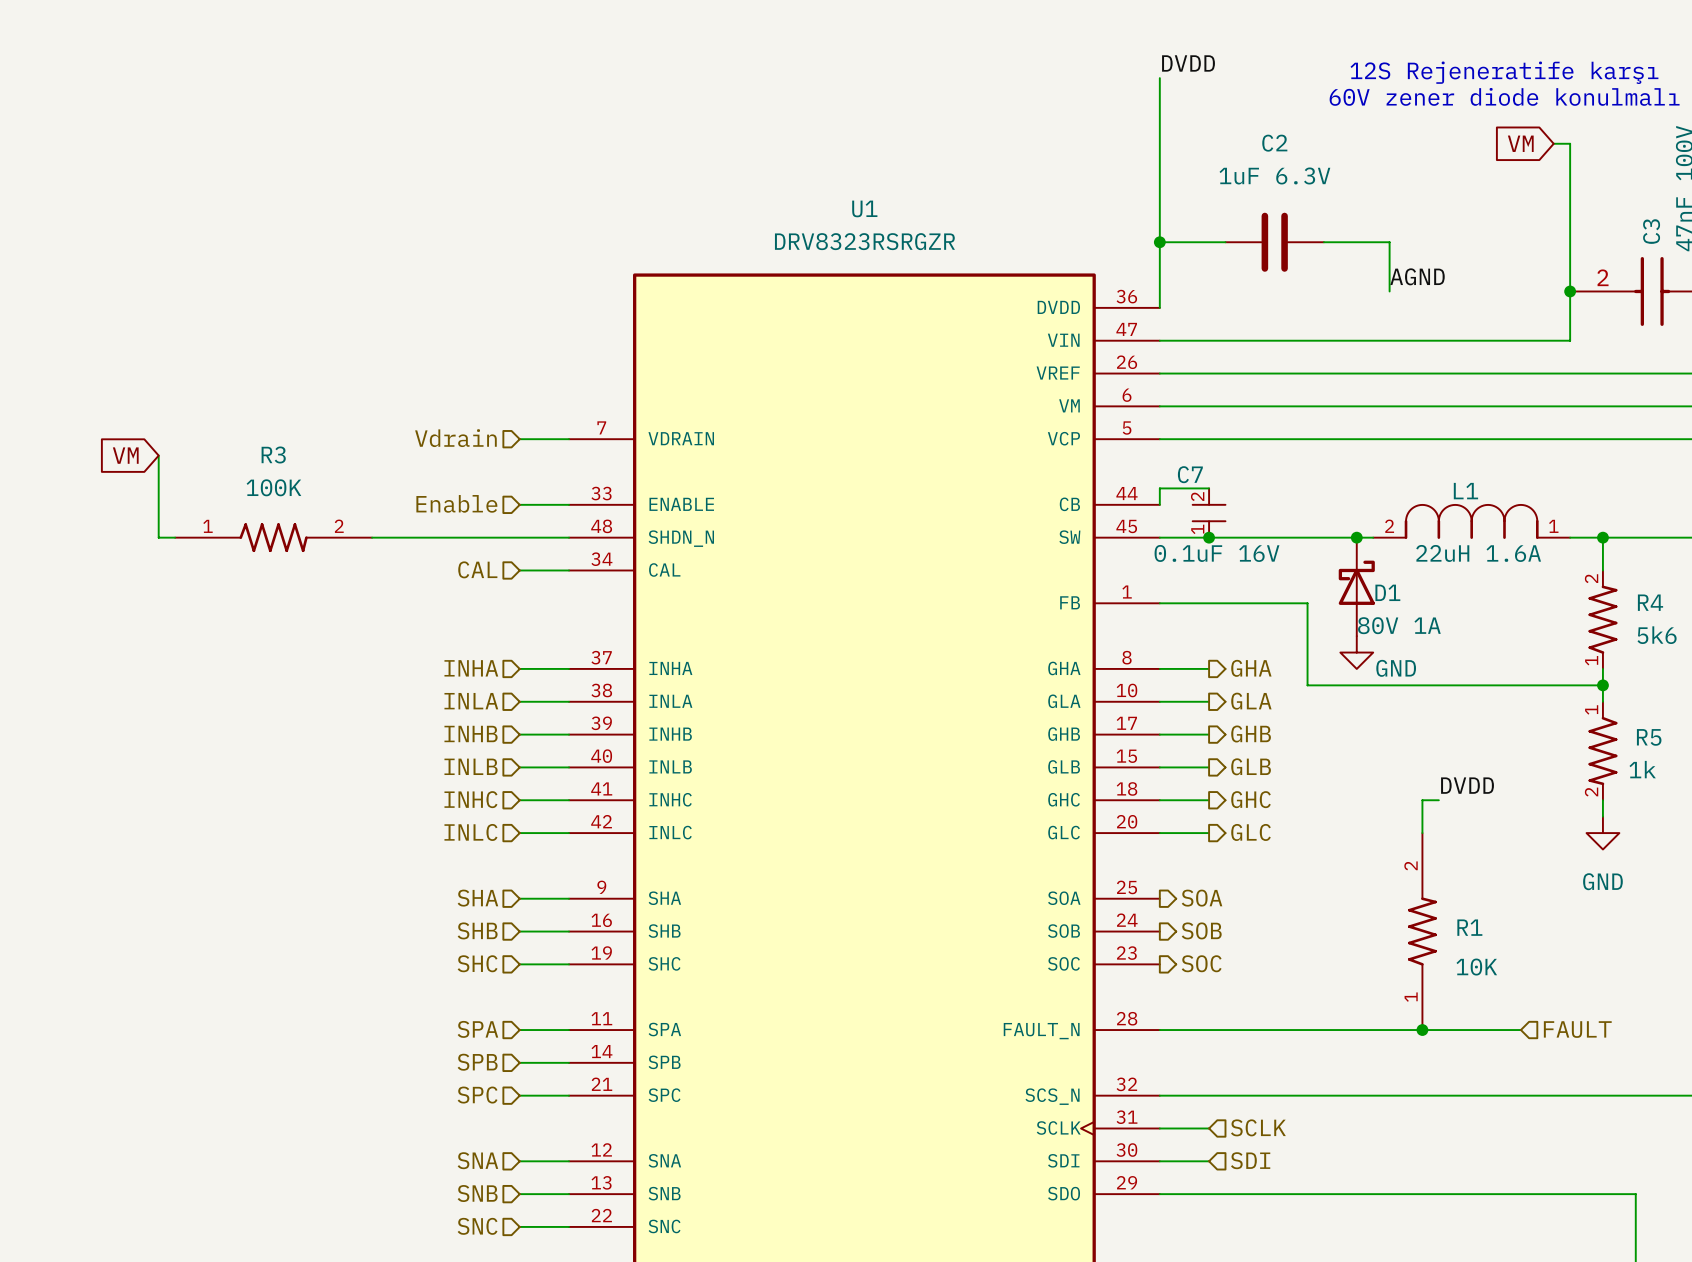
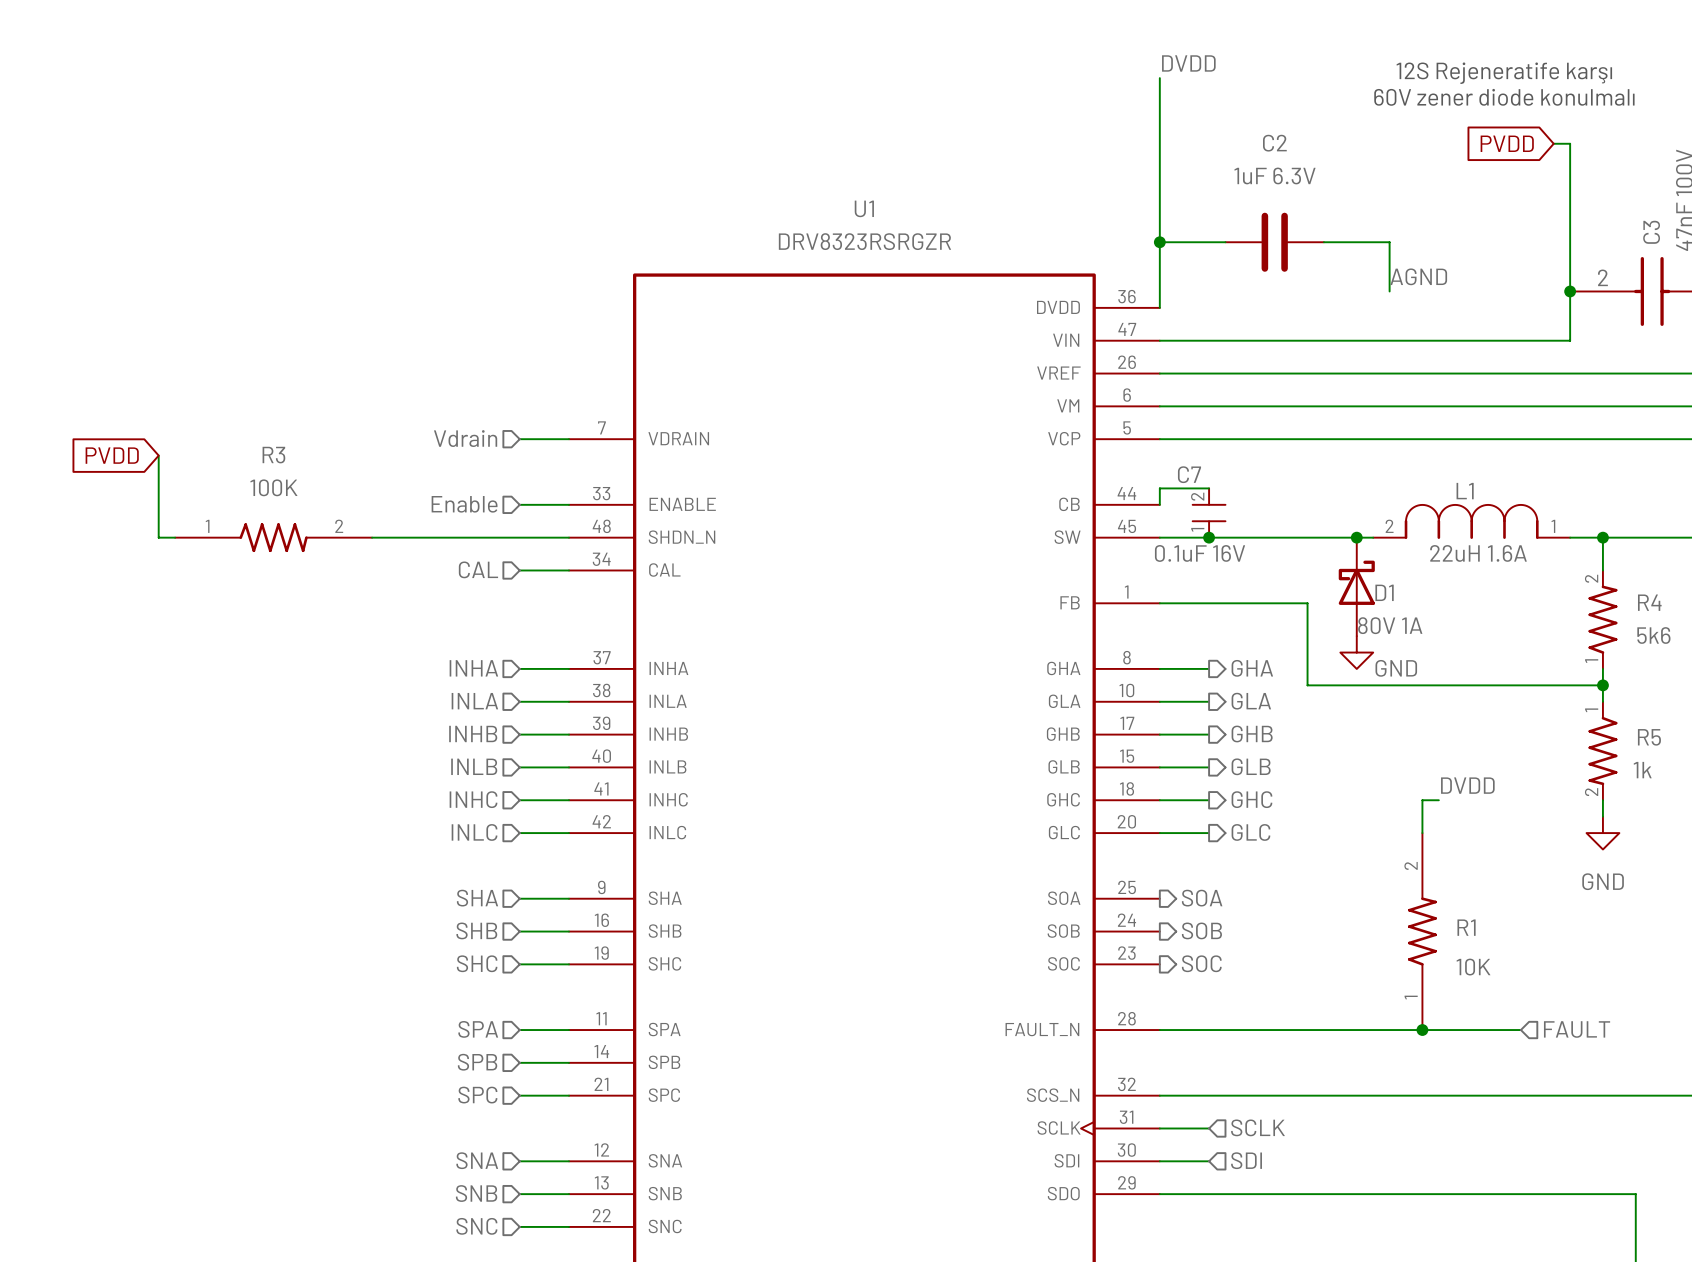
global label: VM (1520, 143) -> PVDD (1507, 143)
global label: VM (125, 455) -> PVDD (112, 455)

